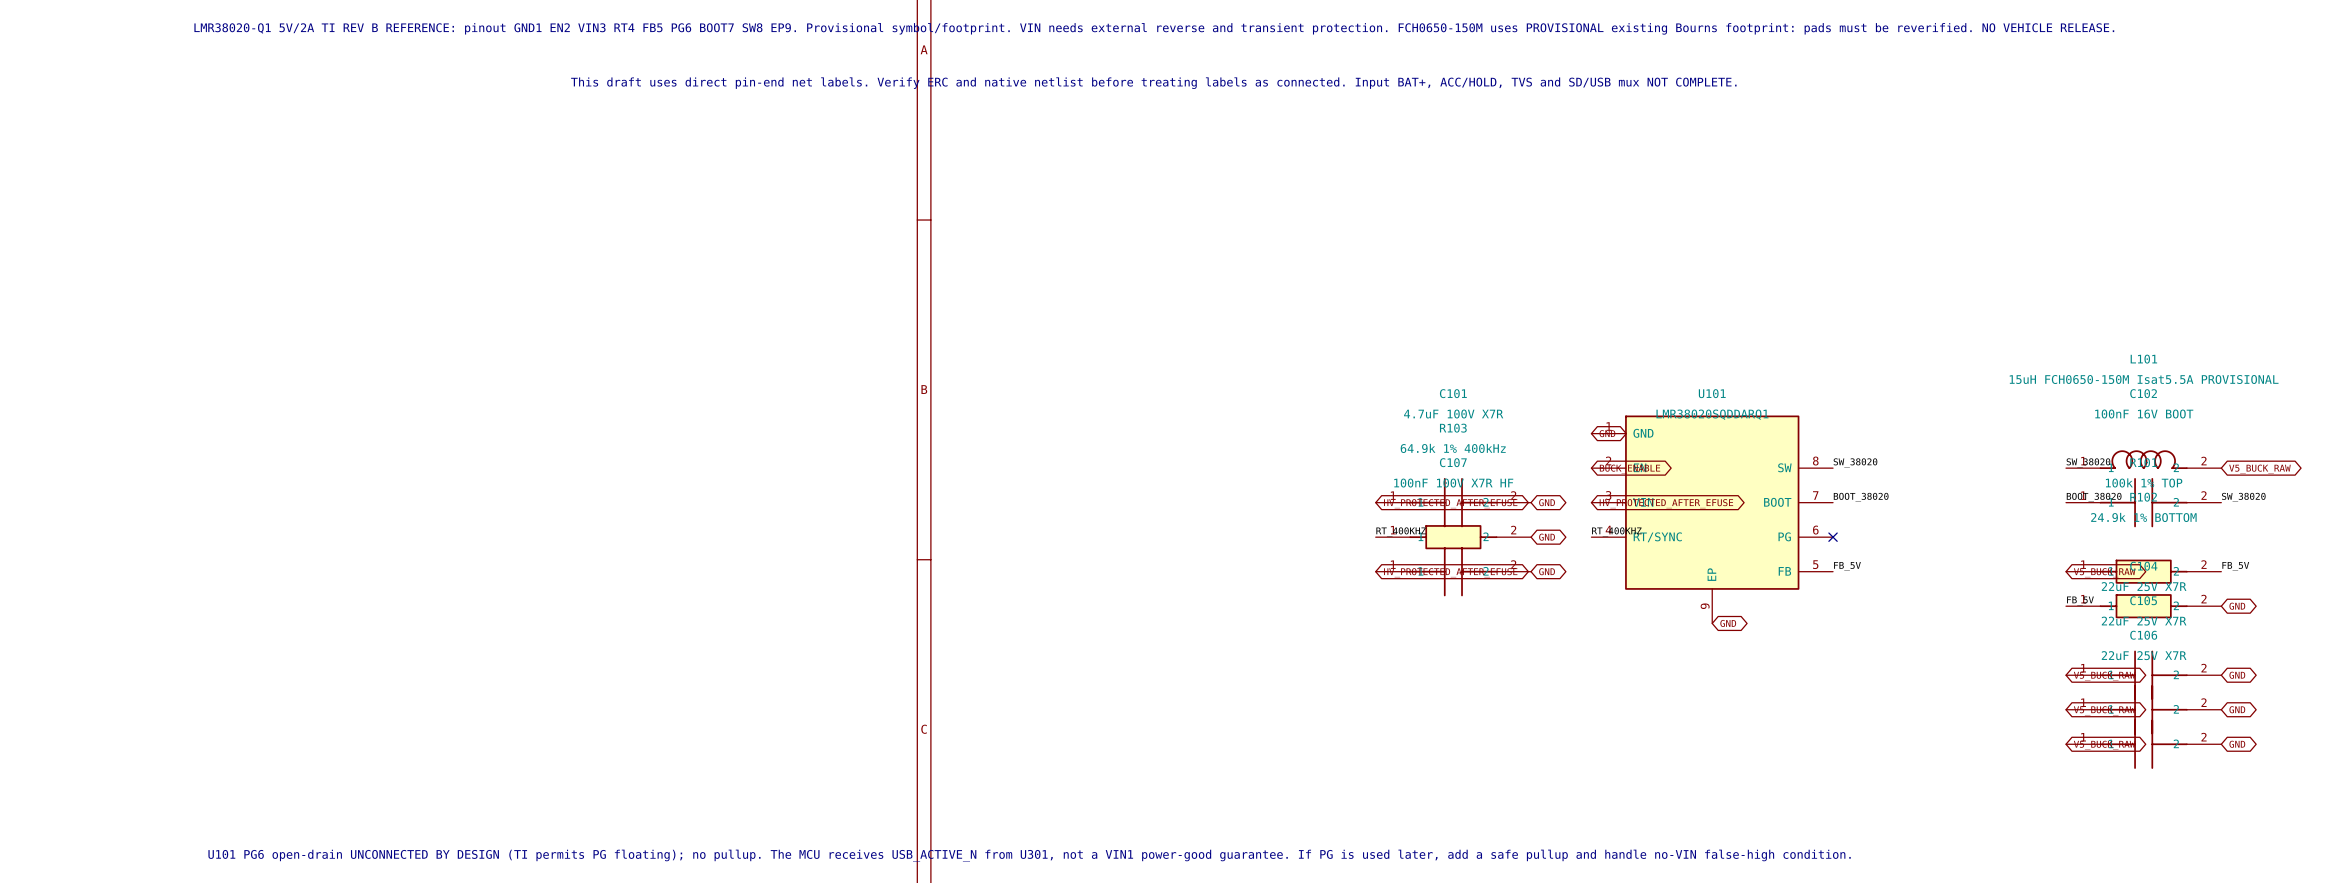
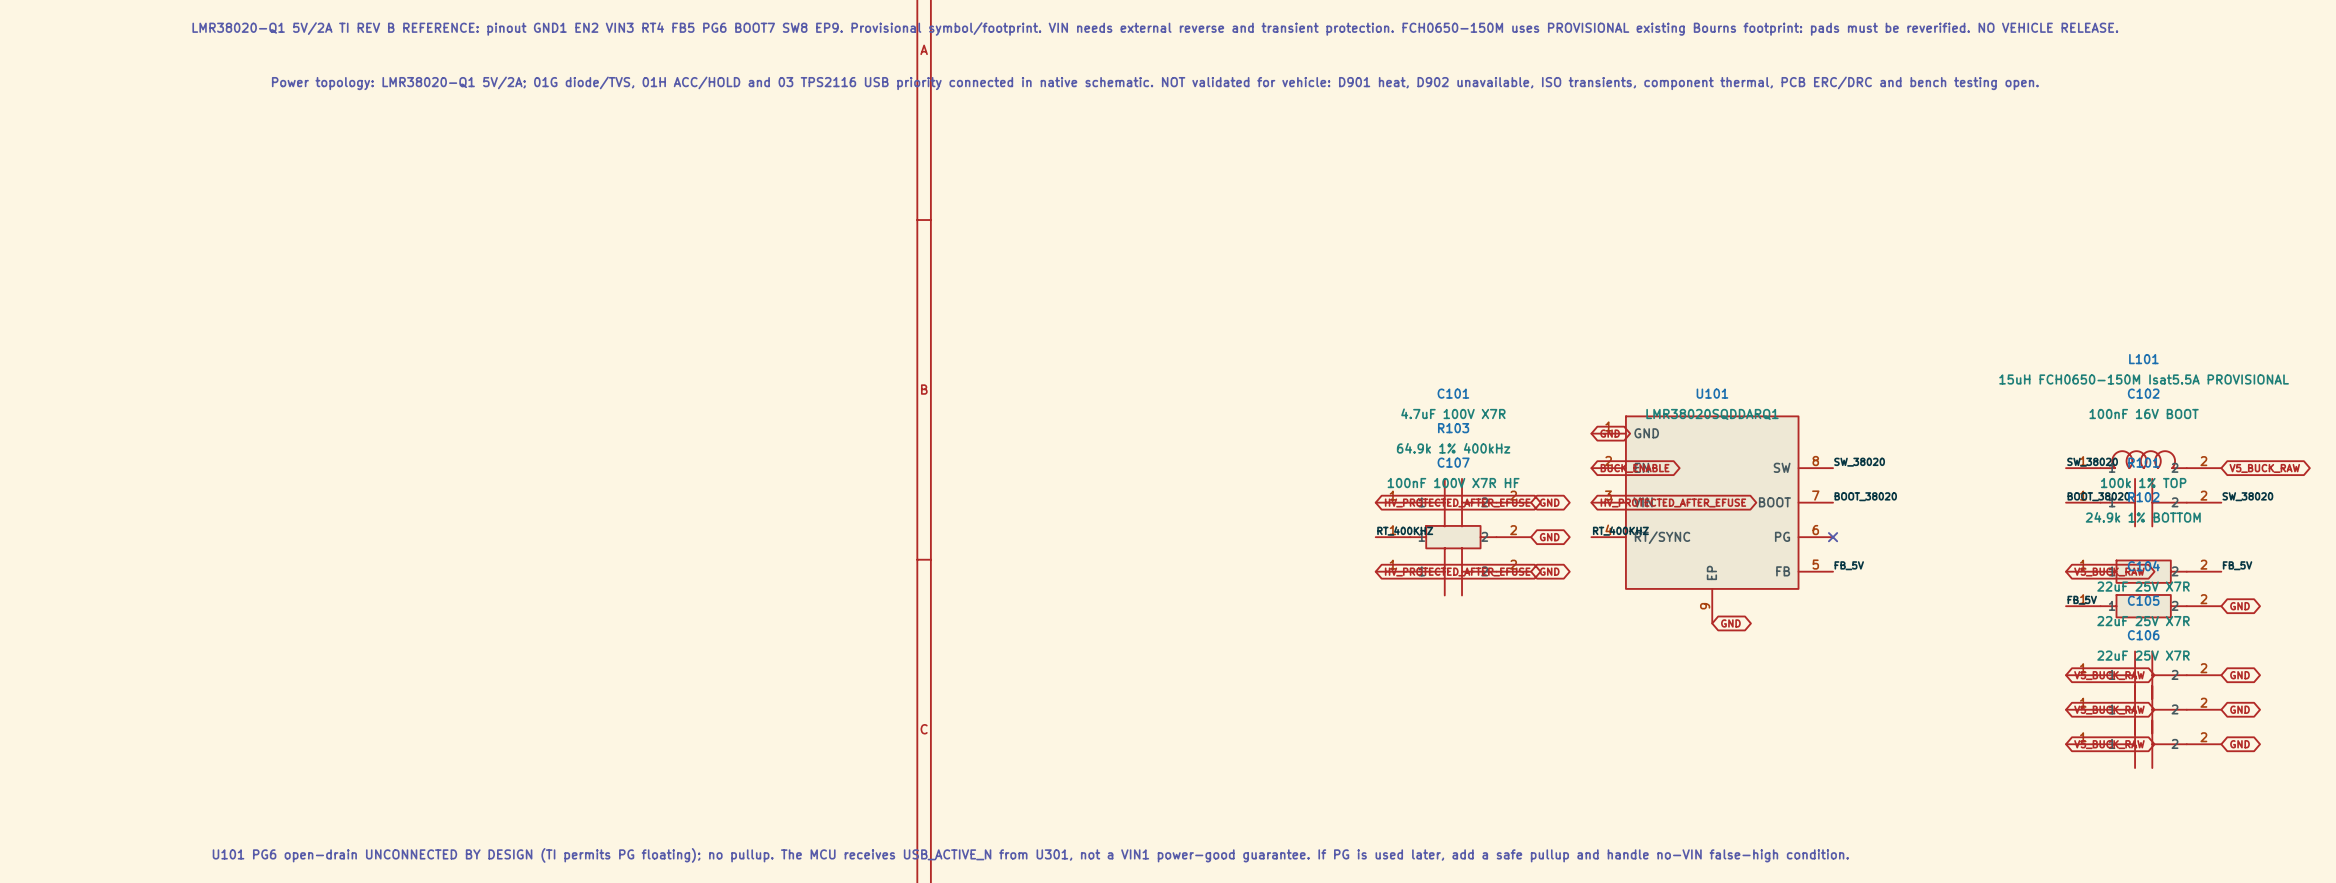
text: This draft uses direct pin-end net labels. Verify ERC and native netlist before treating labels as connected. Input BAT+, ACC/HOLD, TVS and SD/USB mux NOT COMPLETE. (1153, 83) -> Power topology: LMR38020-Q1 5V/2A; 01G diode/TVS, 01H ACC/HOLD and 03 TPS2116 USB priority connected in native schematic. NOT validated for vehicle: D901 heat, D902 unavailable, ISO transients, component thermal, PCB ERC/DRC and bench testing open. (1155, 83)

